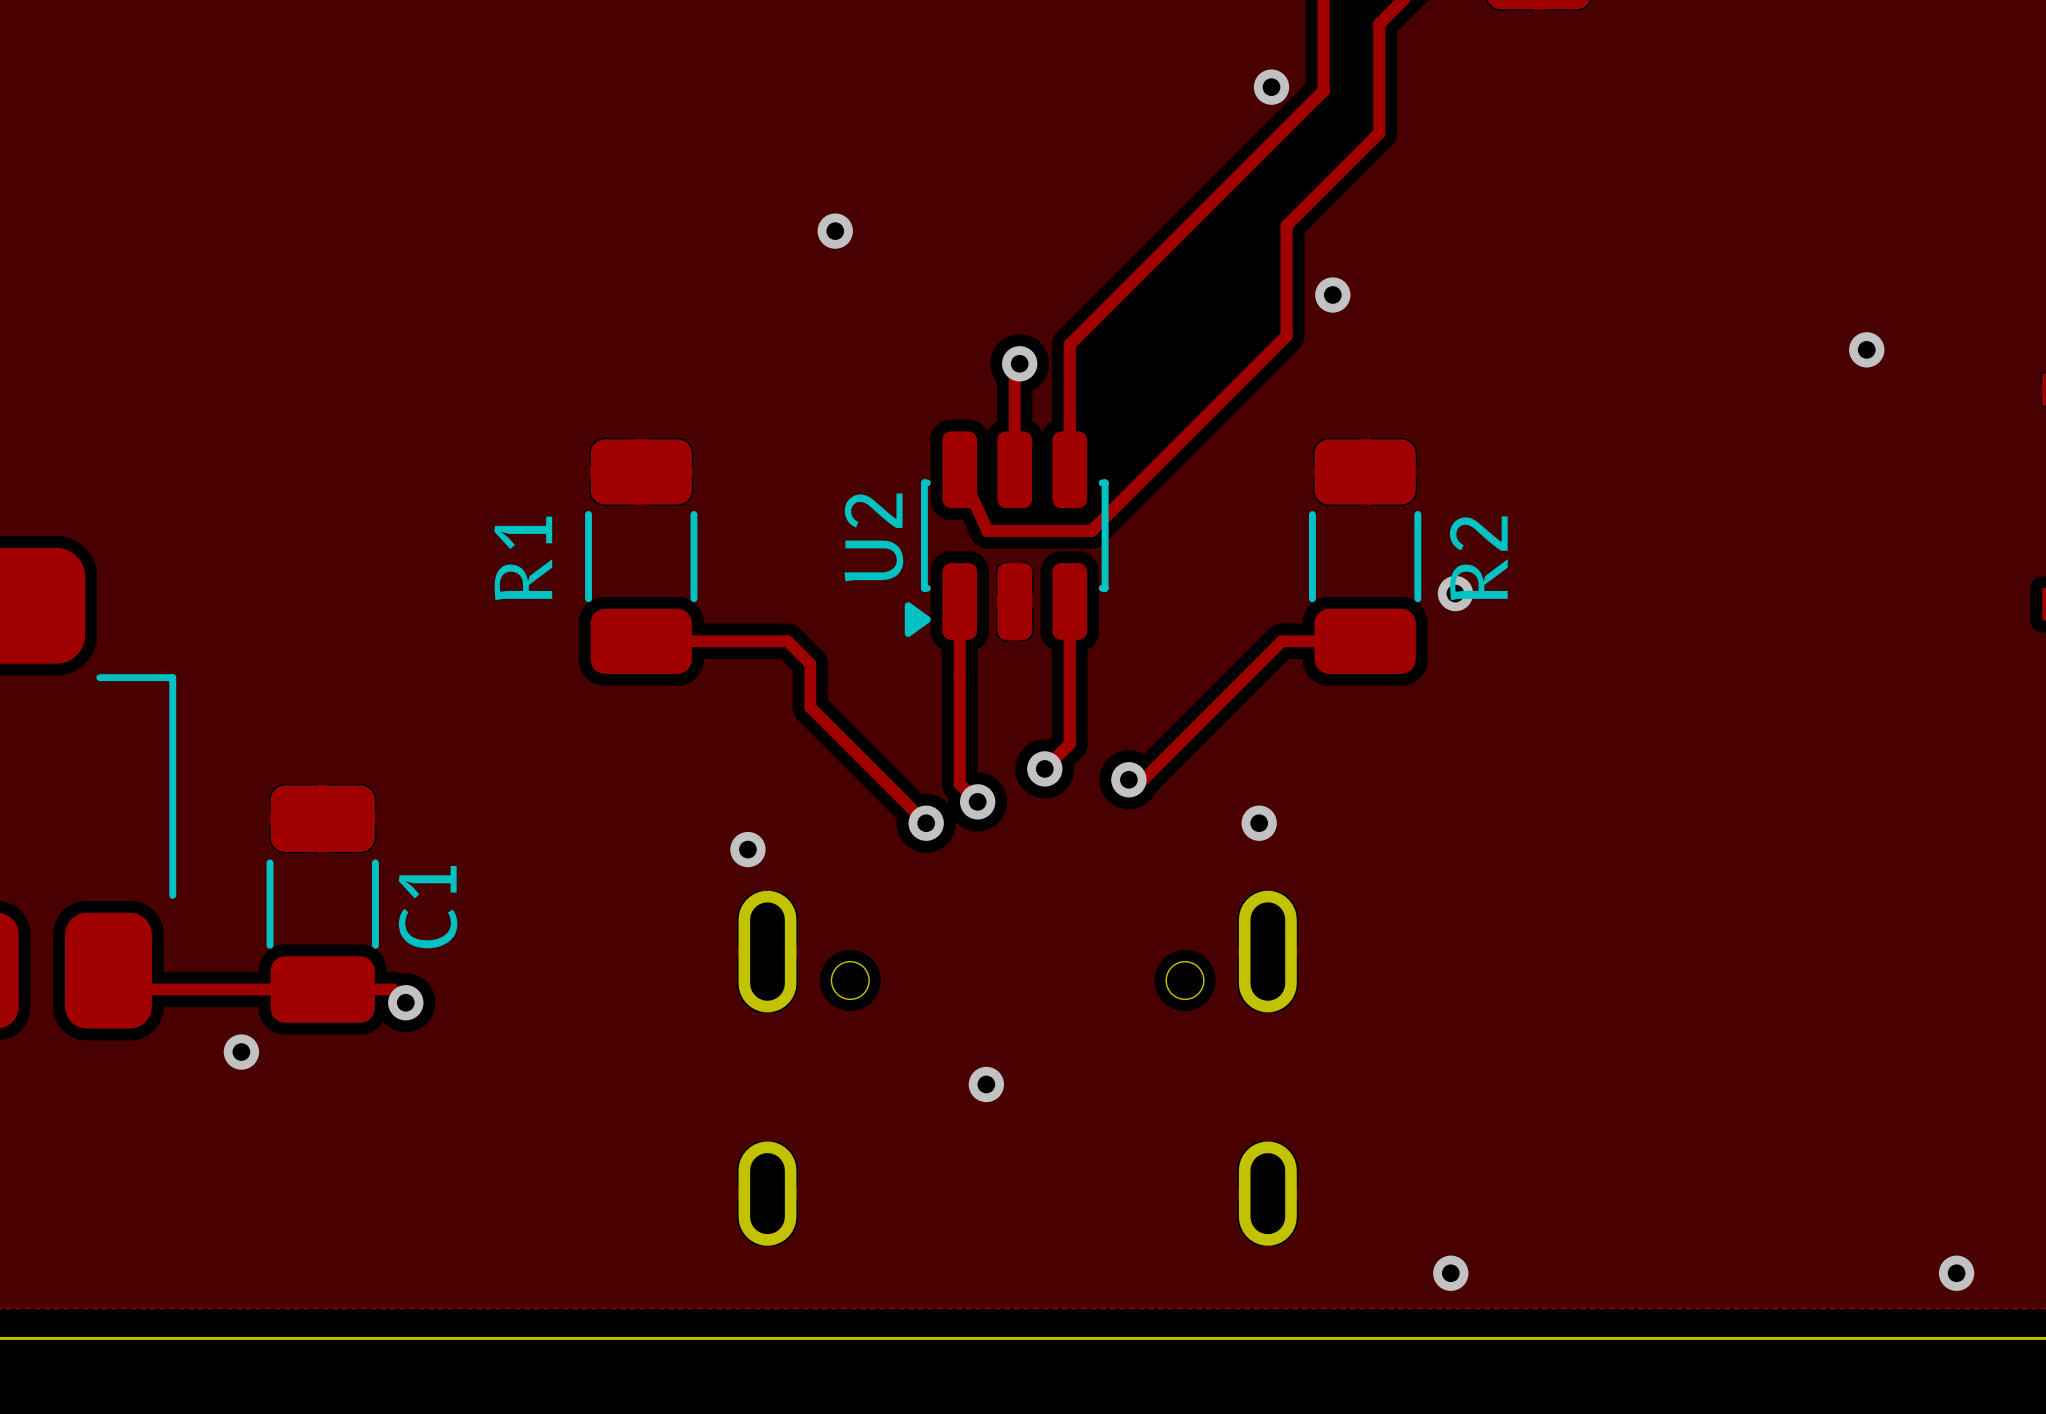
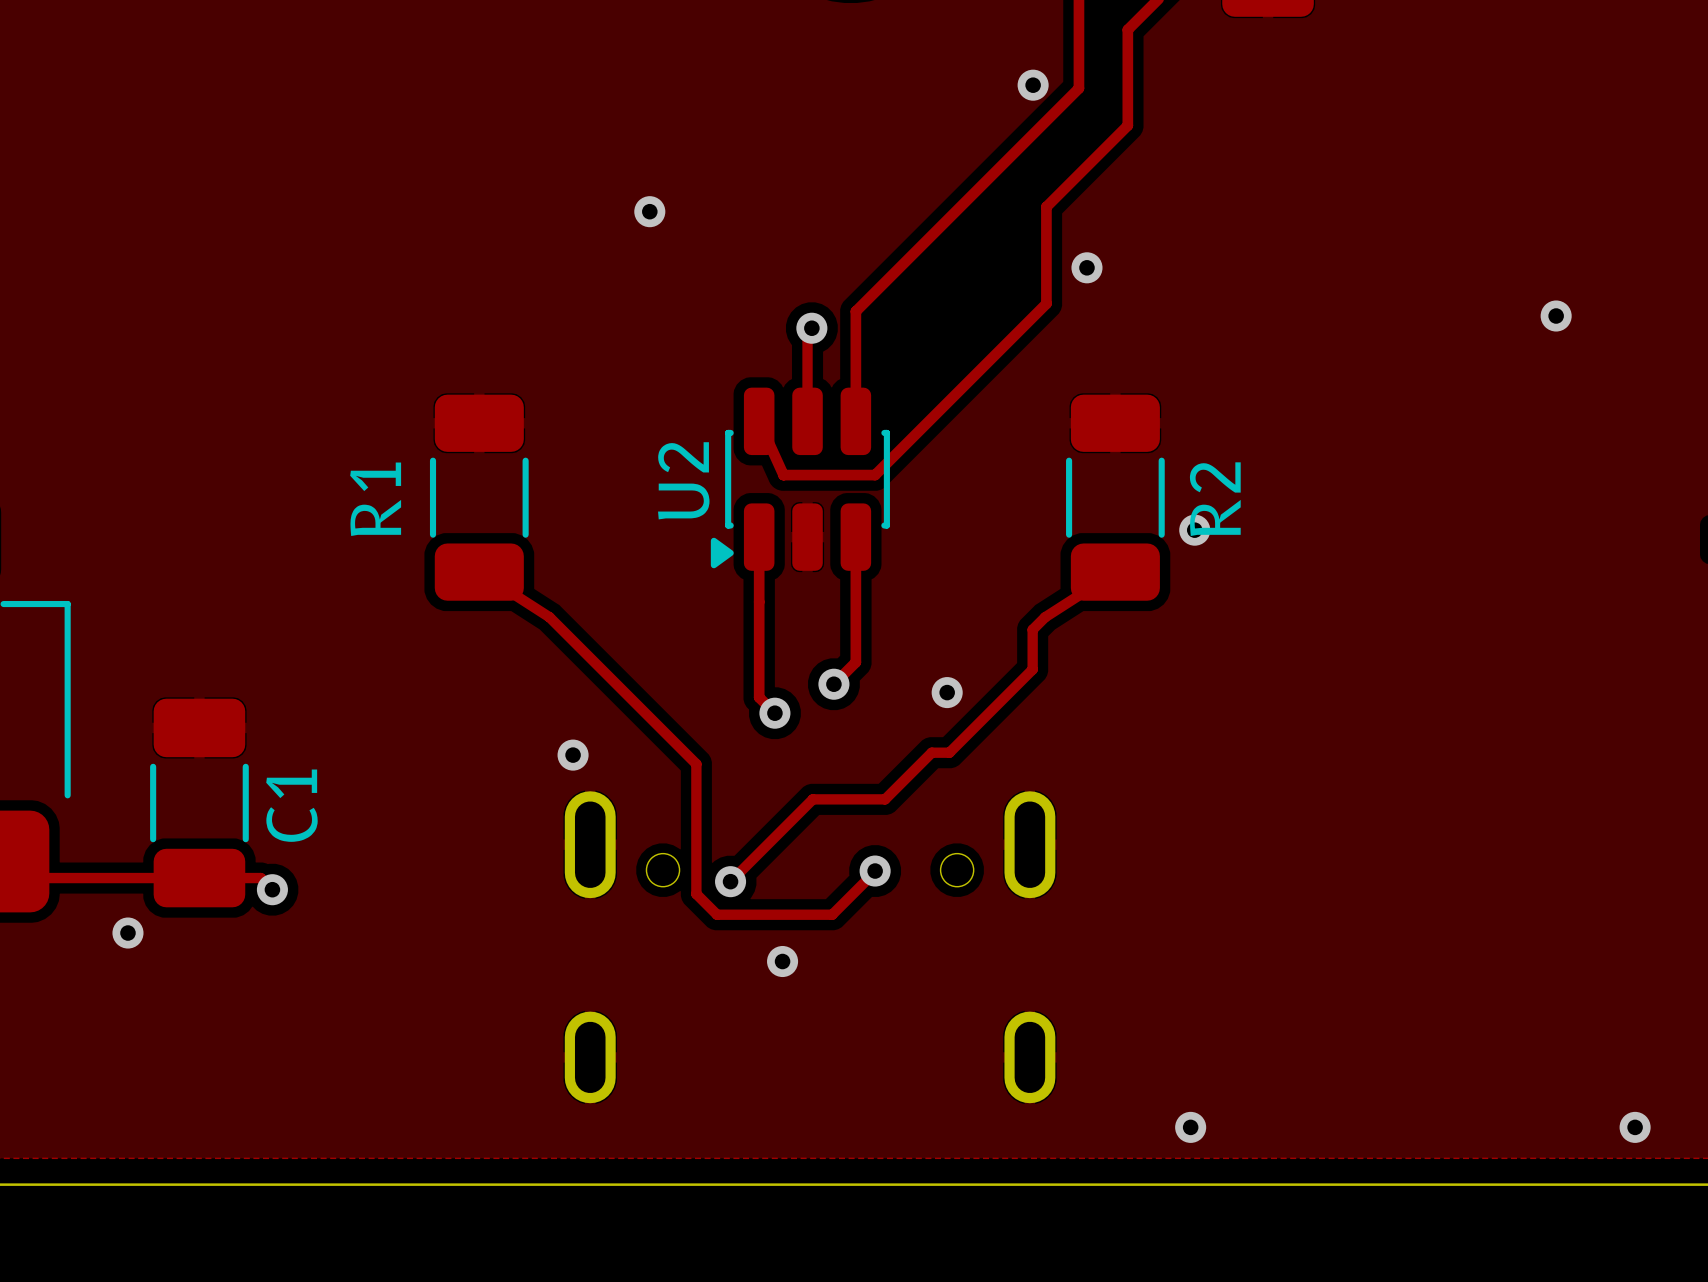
track: (641, 641) (787, 641) (810, 663) (810, 707) (926, 823) -> (479, 572) (549, 617) (696, 764) (696, 894) (717, 914) (832, 914) (870, 876)
track: (1365, 641) (1281, 641) (1143, 779) (1128, 779) -> (1115, 572) (1045, 617) (1032, 629) (1032, 669) (949, 752) (931, 752) (885, 799) (812, 799) (730, 881)
via position: (1128, 779) -> (947, 692)
via: (926, 823) -> none
via: (1259, 823) -> none
via: none -> (875, 871)
via: none -> (730, 881)

